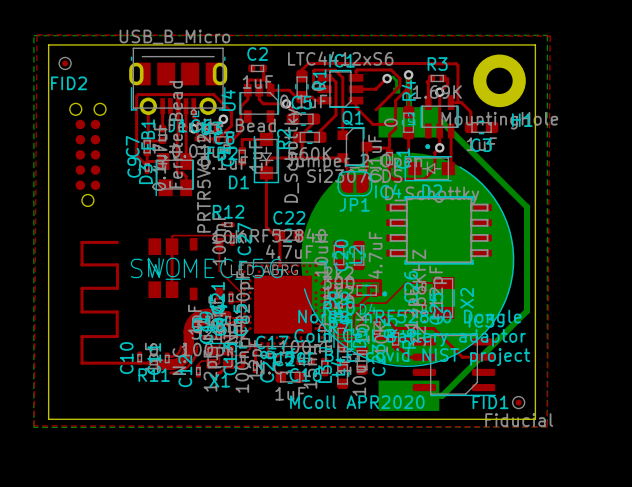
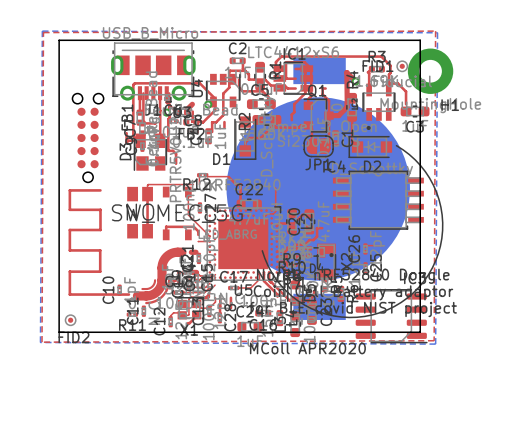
top zone outline: (36, 34) (34, 425) (547, 426) (550, 36) (36, 34) -> (435, 31) (43, 32) (42, 342) (434, 340) (435, 31)
bottom zone outline: (547, 35) (33, 35) (33, 427) (547, 427) (547, 35) -> (42, 31) (40, 342) (435, 344) (437, 32) (42, 31)
board edge: (68, 44) (48, 44) (48, 419) (535, 419) (535, 44) (487, 44) -> (59, 40) (59, 332) (420, 332) (420, 40)
FID2 position: (65, 63) -> (70, 320)
C2 position: (257, 68) -> (237, 60)
top track: (263, 68) (263, 77) (270, 84) (270, 90) (289, 90) (296, 97) (312, 97) (315, 100) (324, 100) -> (242, 61) (242, 68) (248, 74) (248, 79) (265, 79) (271, 85) (284, 85) (287, 88) (295, 88)
top track: (408, 74) (408, 112) -> none
bottom track: (408, 74) (408, 122) (442, 122) (527, 207) (527, 311) (442, 395) (408, 395) -> none
via: (408, 74) -> none
top track: (301, 76) (301, 69) (308, 63) (456, 63) (457, 65) (457, 102) -> none
top track: none -> (275, 67) (275, 62) (281, 56) (381, 56) (390, 65) (389, 83) (397, 83) (406, 91) (406, 104)
top track: (324, 77) (331, 77) (335, 82) (335, 115) (320, 130) (320, 137) -> none
top track: (356, 77) (357, 69) (391, 69) (399, 78) (399, 86) (376, 109) -> none
top track: none -> (295, 68) (301, 68) (305, 72) (305, 93) (294, 104) (291, 120)
top track: (387, 78) (375, 89) (356, 89) -> none
bottom track: (387, 78) (393, 77) (396, 80) (396, 90) -> none
via: (387, 78) -> none
top track: (447, 78) (447, 84) (439, 92) (439, 147) (434, 152) (434, 168) (424, 179) (393, 179) (389, 175) (389, 169) -> none
top track: (266, 80) (247, 80) (247, 99) (240, 106) (240, 131) (232, 139) (227, 139) (227, 150) -> (245, 70) (229, 71) (229, 87) (223, 93) (223, 115) (216, 122) (212, 122) (212, 131)
top track: (408, 87) (395, 100) (395, 124) -> none
top track: (324, 89) (313, 88) (313, 70) (335, 70) (342, 77) (342, 135) -> none
top track: none -> (295, 78) (286, 77) (286, 62) (304, 62) (311, 68) (311, 96) (308, 99) (308, 105)
top track: (259, 90) (259, 99) (263, 103) (286, 103) (292, 110) (292, 119) -> (239, 79) (239, 87) (242, 91) (262, 91) (268, 96) (268, 104)
via: none -> (355, 81)
via: (439, 92) -> none
top track: none -> (353, 81) (346, 72) (346, 107) (338, 115) (328, 115)
top track: (359, 100) (356, 100) (356, 107) (373, 124) (395, 124) -> none
top track: none -> (325, 88) (322, 88) (322, 94) (328, 100) (328, 142) (325, 146)
top track: (451, 102) (461, 102) (470, 111) (470, 126) -> none
via: (286, 103) -> none
top track: (148, 106) (147, 141) (162, 140) -> (143, 93) (142, 123) (155, 122)
top track: (178, 106) (177, 172) (182, 172) (186, 176) (186, 187) -> (169, 93) (168, 150) (176, 153) (176, 163)
top track: (270, 116) (270, 135) (266, 139) (242, 139) (242, 145) -> none
via position: (223, 119) -> (208, 104)
top track: (313, 119) (313, 122) (299, 137) (302, 140) (302, 158) -> none
top track: (395, 124) (395, 128) (389, 134) (389, 148) (366, 146) (366, 179) (362, 183) -> none
top track: (205, 127) (204, 138) (217, 139) (231, 125) (231, 112) (213, 94) (138, 94) (136, 96) (136, 155) (147, 163) -> (192, 111) (192, 121) (203, 122) (215, 110) (215, 98) (199, 83) (134, 83) (133, 135) (142, 142)
top track: (451, 130) (451, 166) (448, 168) -> none
top track: none -> (224, 122) (224, 127)
top track: none -> (273, 125) (276, 127) (298, 127) (301, 125) (308, 125) (311, 128) (311, 146)
top track: none -> (273, 125) (260, 138) (249, 138) (245, 142) (245, 150)
C7 position: (147, 146) -> (142, 128)
Q1 position: (354, 146) -> (318, 115)
via: (439, 147) -> none
part position: (87, 154) -> (88, 137)
D1 position: (266, 158) -> (245, 138)
C9 position: (147, 167) -> (142, 146)
top track: (347, 183) (347, 162) (342, 158) (271, 158) (266, 163) (266, 227) (274, 235) (279, 235) (280, 265) -> none
JP1 position: (354, 183) -> (318, 146)
top track: none -> (199, 175) (199, 184)
top track: none -> (206, 175) (229, 176)
top track: none -> (228, 177) (236, 184) (240, 184) (240, 210)
top track: none -> (275, 187) (275, 211) (263, 215)
R12 position: (228, 224) -> (202, 175)
top track: (225, 235) (172, 236) (172, 289) -> (193, 184) (147, 185) (147, 231)
top track: (225, 235) (232, 235) -> none
top track: (117, 242) (82, 242) (82, 264) -> (128, 294) (69, 294) (69, 271) (100, 271) (100, 250) (69, 250) (70, 229)
top track: (219, 244) (219, 270) (244, 295) -> (188, 192) (188, 214) (209, 236)
top track: none -> (307, 214) (302, 214) (293, 223) (279, 223) (276, 226)
part position: (407, 259) -> (318, 188)
top track: none -> (322, 228) (317, 228) (317, 236) (313, 240) (309, 240) (304, 244) (294, 244)
top track: (116, 264) (117, 288) (82, 288) (82, 311) (117, 311) (117, 336) (82, 336) (82, 363) (150, 363) -> (100, 229) (100, 209) (69, 209) (69, 190) (100, 190)
part position: (163, 268) -> (140, 212)
part position: (206, 269) -> (177, 213)
top track: none -> (166, 234) (166, 226) (193, 226) (198, 231) (198, 234)
top track: (321, 283) (324, 280) (379, 280) (380, 294) (374, 294) -> none
top track: (424, 283) (406, 283) (386, 303) (367, 302) (353, 315) (353, 336) (337, 336) (332, 331) (332, 323) (315, 322) -> none
top track: (374, 286) (368, 286) (368, 295) (358, 305) (342, 305) -> none
top track: none -> (191, 252) (196, 252)
X2 position: (443, 297) -> (326, 261)
top track: (231, 301) (244, 301) -> (198, 241) (209, 241)
U5 position: (283, 304) -> (243, 244)
top track: (443, 312) (371, 312) (358, 325) (358, 335) (354, 339) (335, 339) (324, 327) (315, 328) -> none
top track: (211, 314) (200, 315) (191, 323) (189, 329) (188, 351) (183, 359) (175, 364) (160, 364) -> (181, 252) (171, 253) (164, 260) (161, 284) (157, 291) (150, 295) (137, 295)
top track: none -> (263, 272) (263, 281) (277, 296)
top track: none -> (269, 272) (269, 280) (289, 300) (309, 300) (314, 295) (314, 291)
top track: (377, 317) (384, 317) (395, 328) (433, 328) (462, 357) (483, 357) -> none
top track: (301, 337) (301, 345) (291, 355) (275, 355) -> (258, 272) (259, 279) (250, 288) (237, 288)
top track: (377, 338) (409, 339) (412, 342) (424, 342) -> none
top track: (180, 346) (176, 354) (166, 356) -> (155, 280) (151, 287) (142, 289)
top track: (197, 346) (195, 356) (189, 365) (180, 370) (170, 372) -> (169, 280) (167, 288) (162, 296) (155, 301) (146, 303)
top track: (395, 349) (401, 349) (409, 357) (424, 357) -> none
C17 position: (272, 355) -> (233, 288)
C10 position: (139, 358) -> (119, 290)
top track: (243, 363) (241, 367) (232, 367) -> (208, 294) (207, 298) (199, 298)
FID1 position: (518, 402) -> (402, 66)

